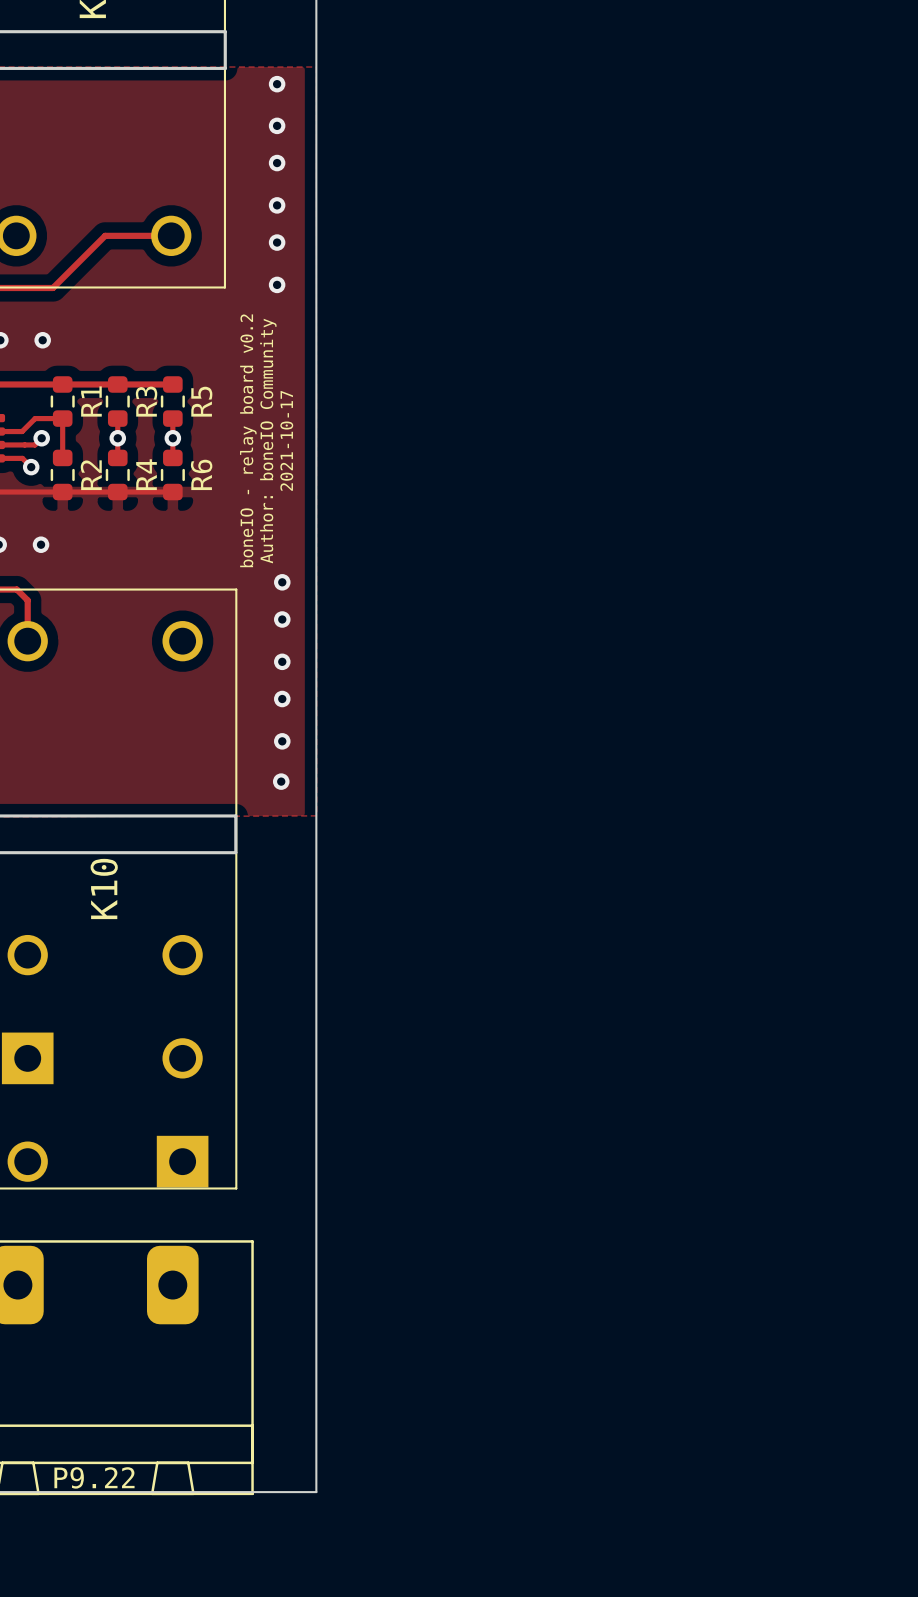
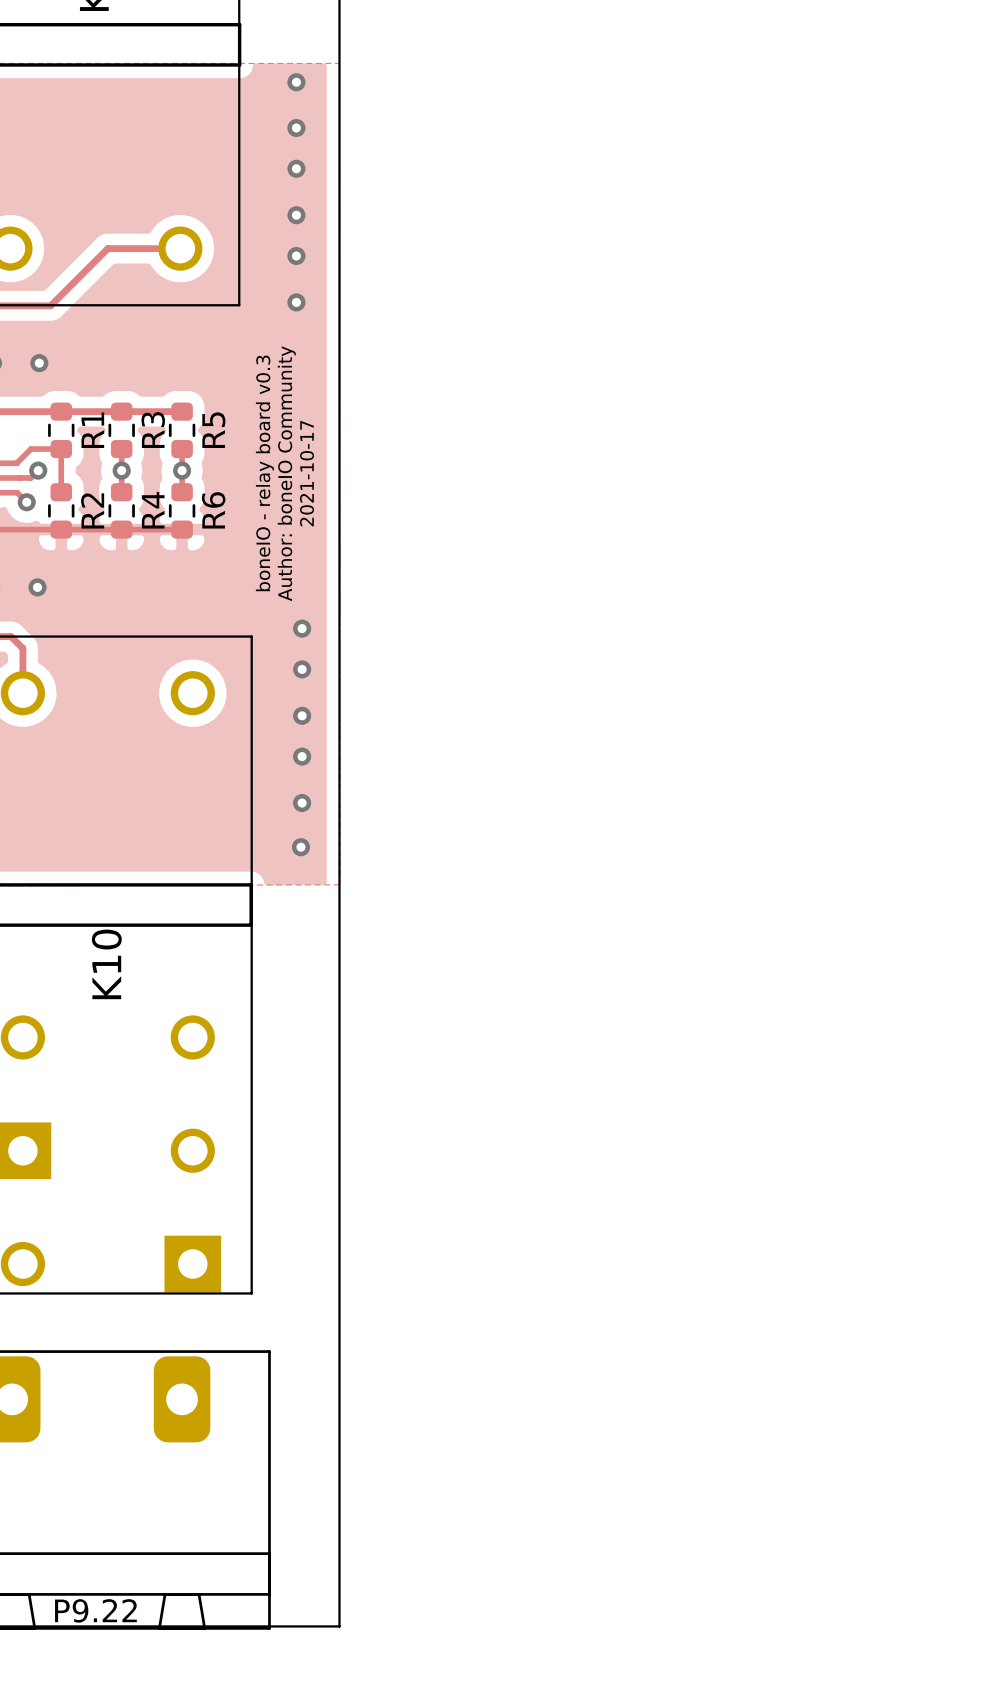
text: boneIO - relay board v0.2 (248, 440) -> boneIO - relay board v0.3 (264, 473)

